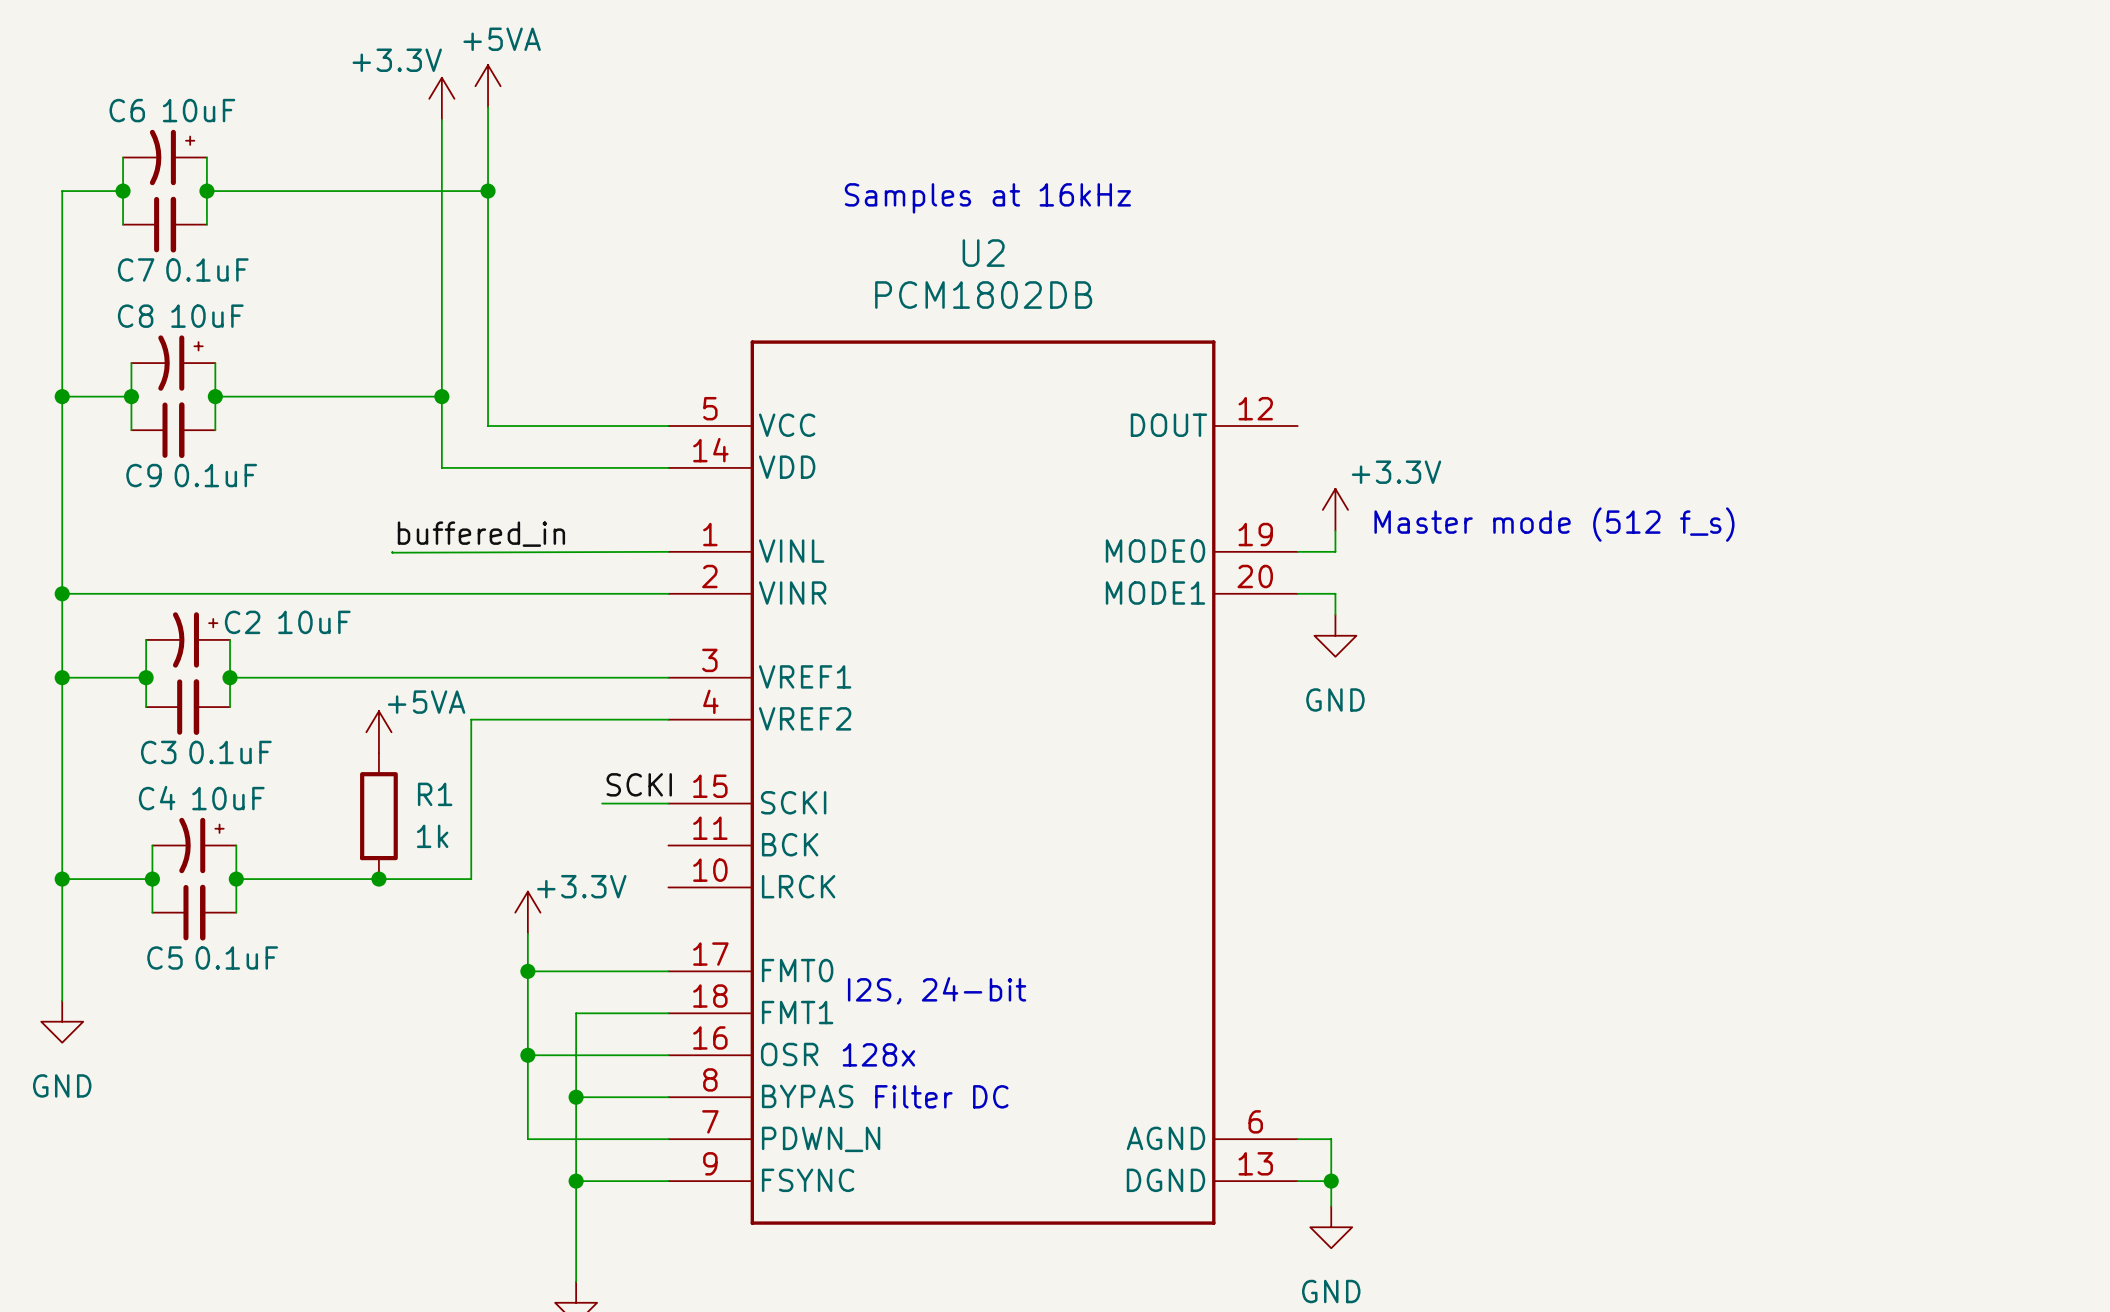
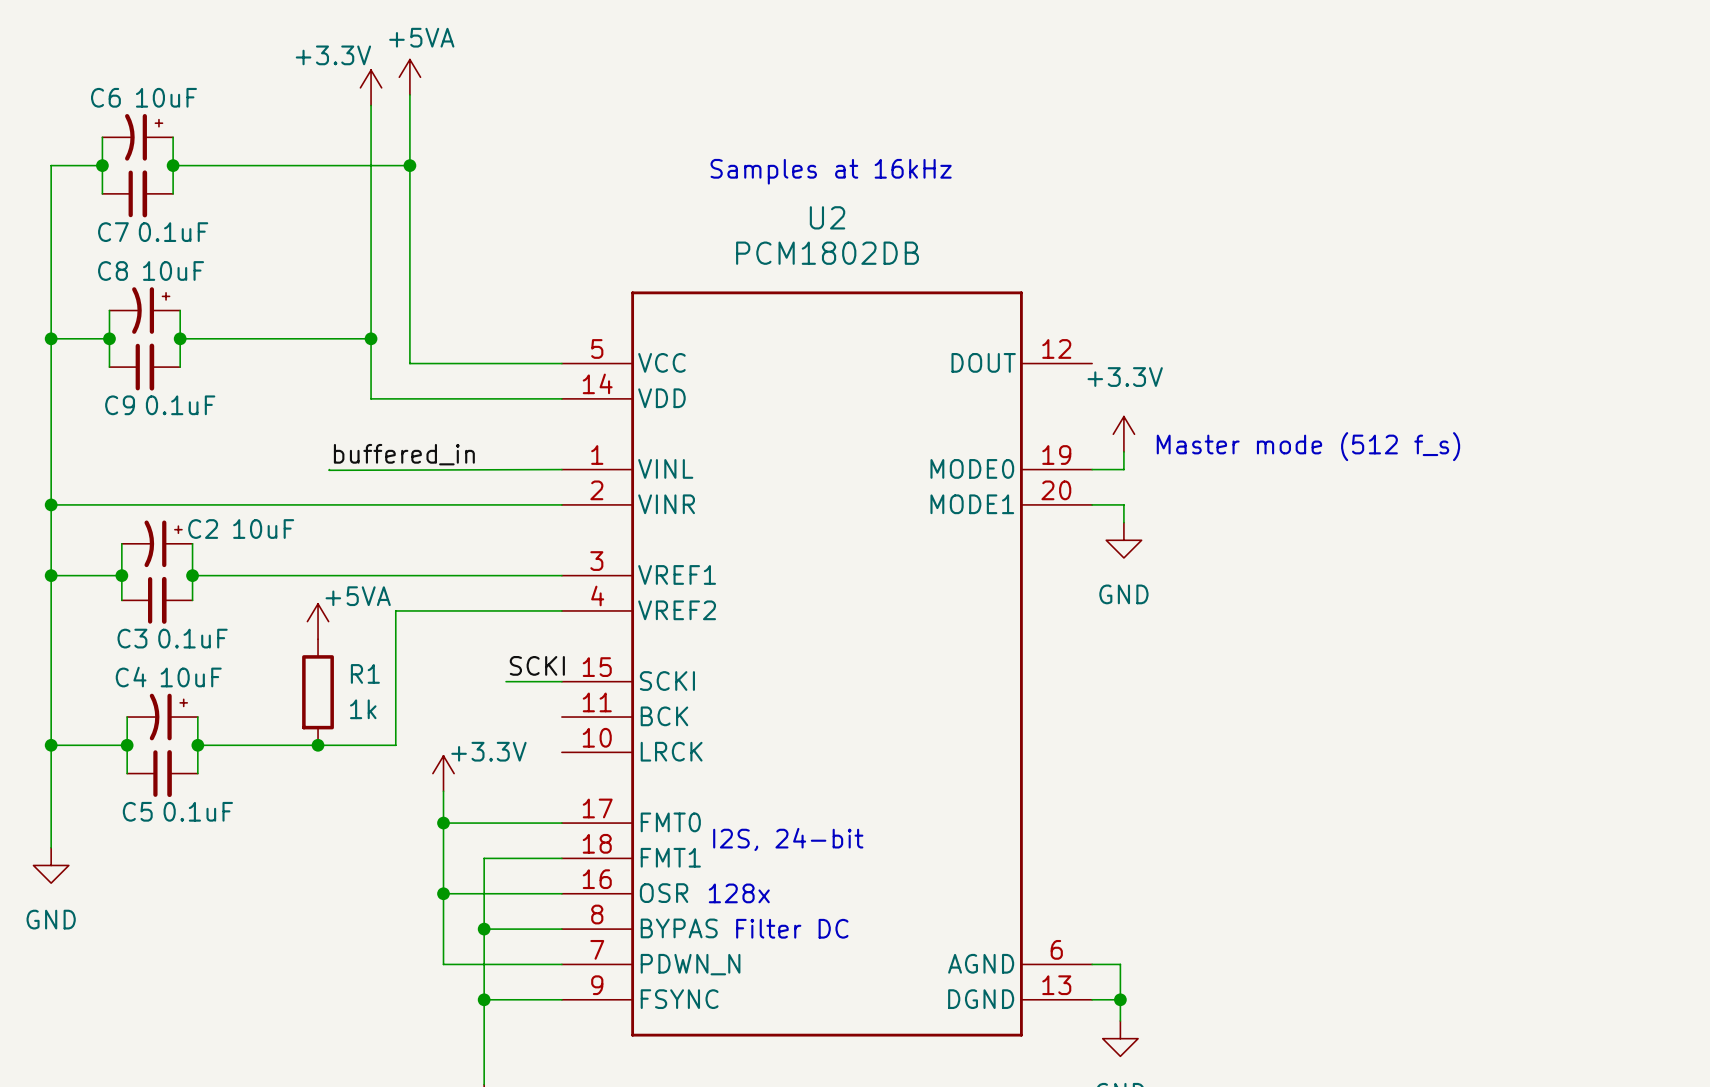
power symbol text position: +3.3V (1396, 472) -> +3.3V (1125, 377)

